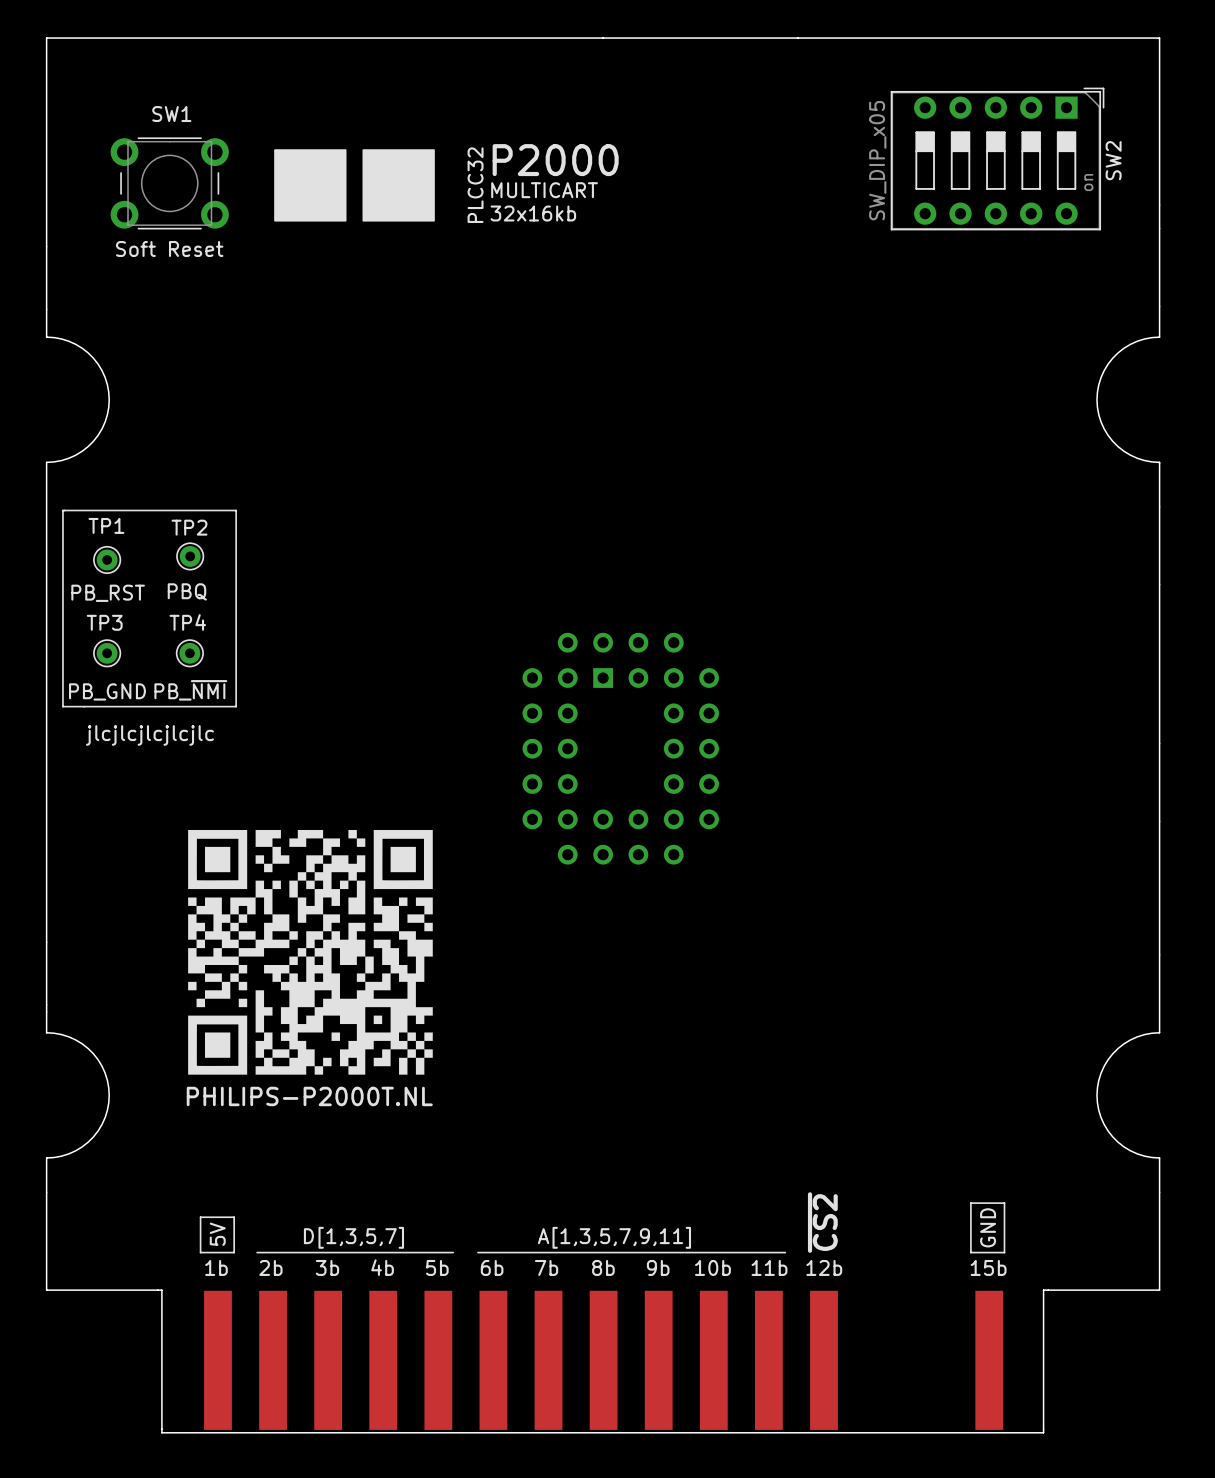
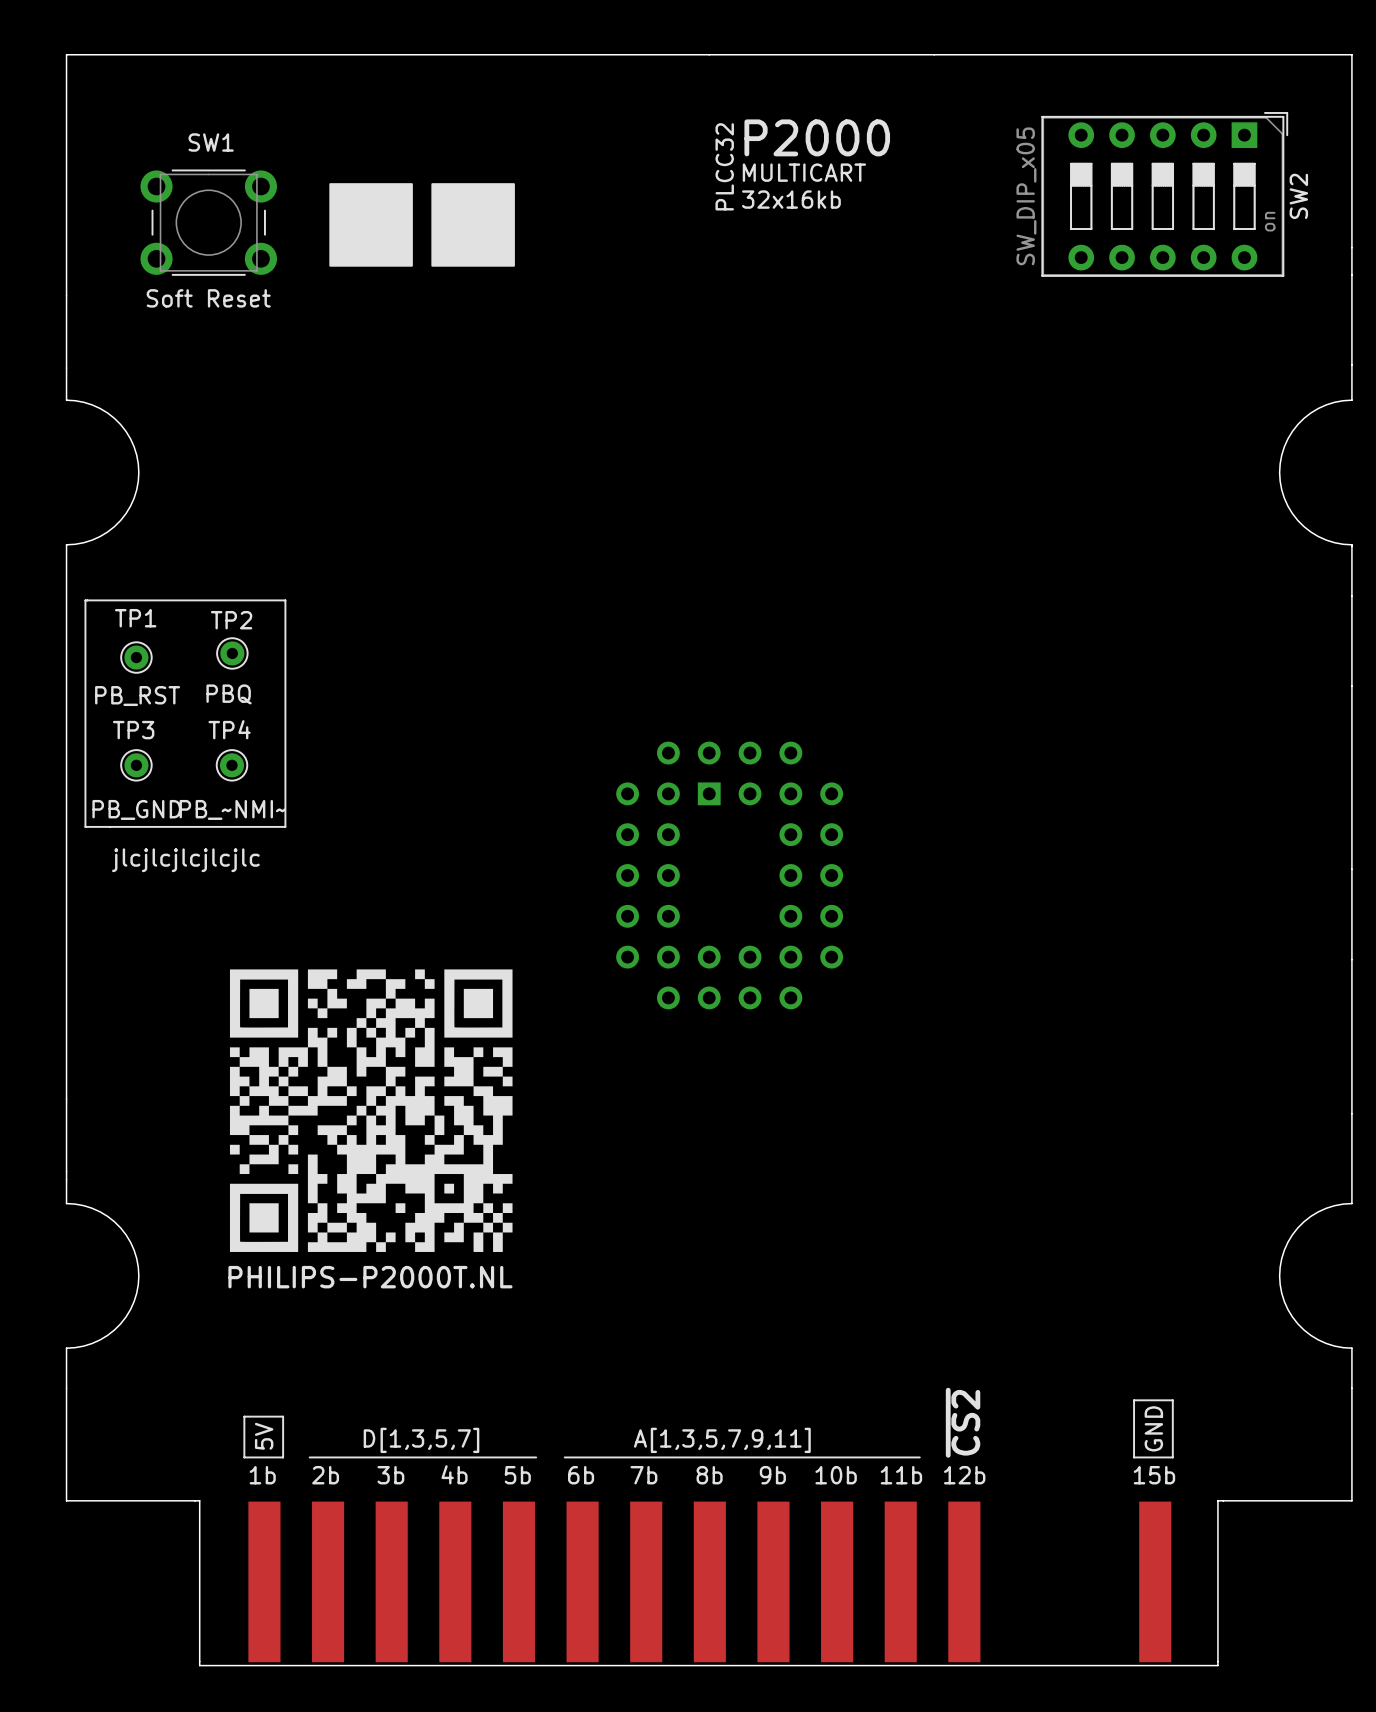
text position: P2000 (555, 160) -> P2000 (817, 137)
text position: PLCC32 (475, 185) -> PLCC32 (724, 166)
text position: MULTICART (544, 190) -> MULTICART (804, 172)
text position: 32x16kb (533, 213) -> 32x16kb (791, 199)
TP4 value: PB_~{NMI} (190, 690) -> PB_~NMI~ (232, 809)

